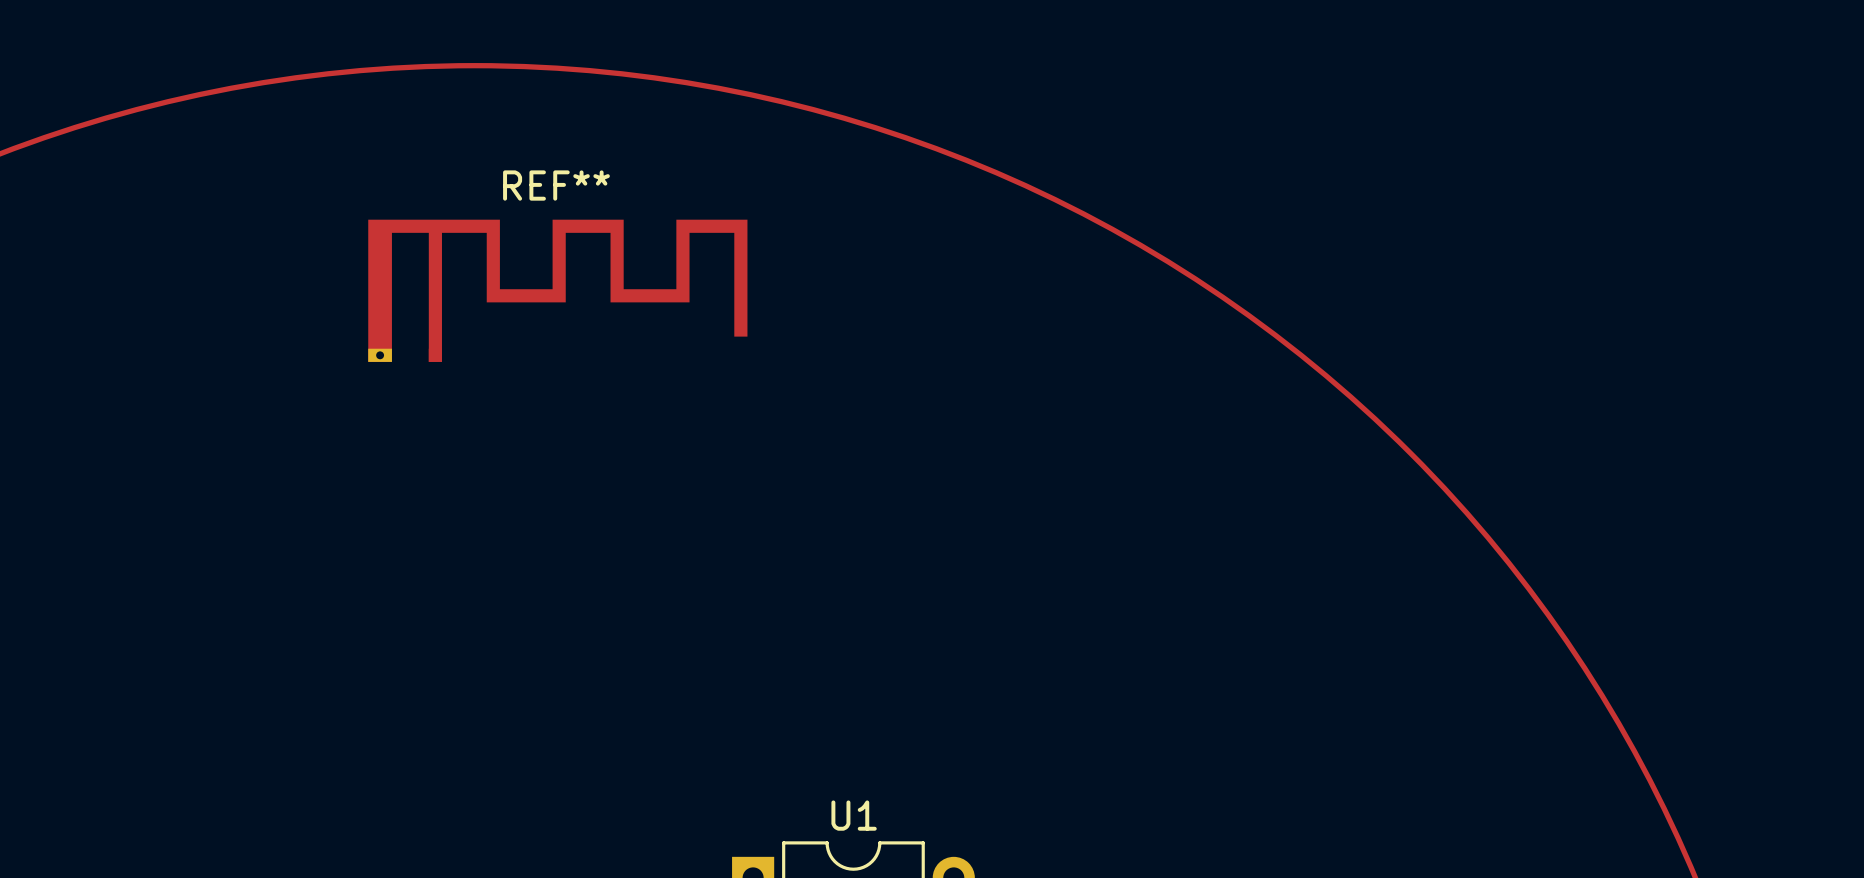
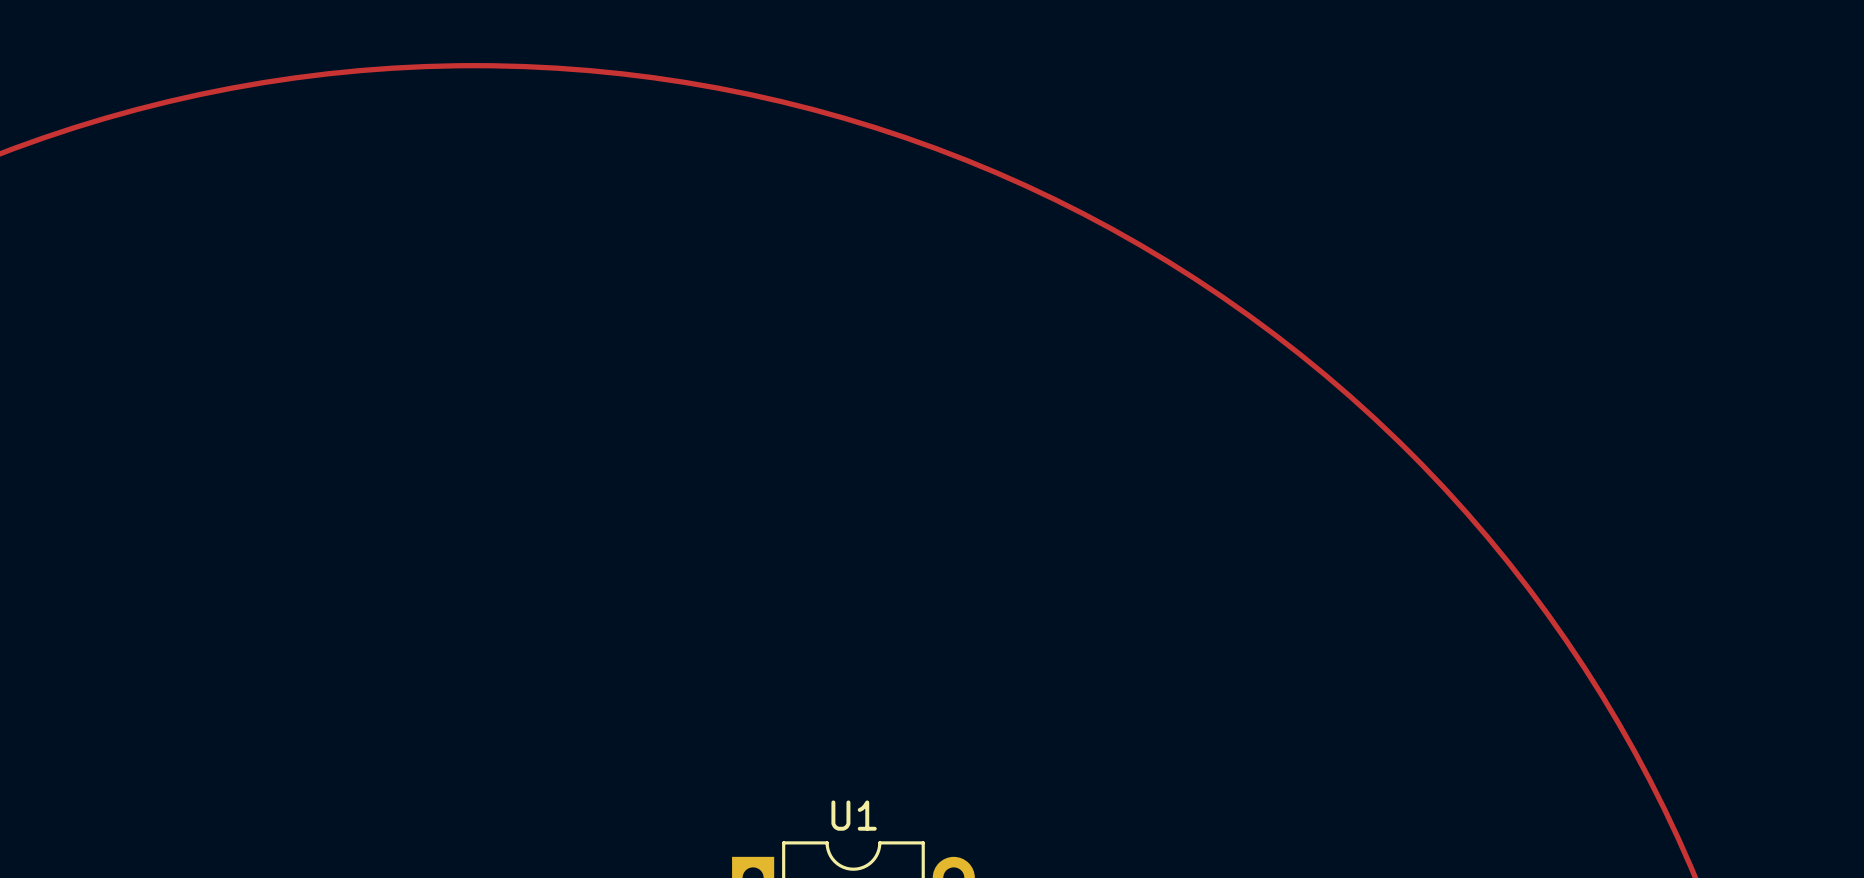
REF**: (557, 290) -> none

